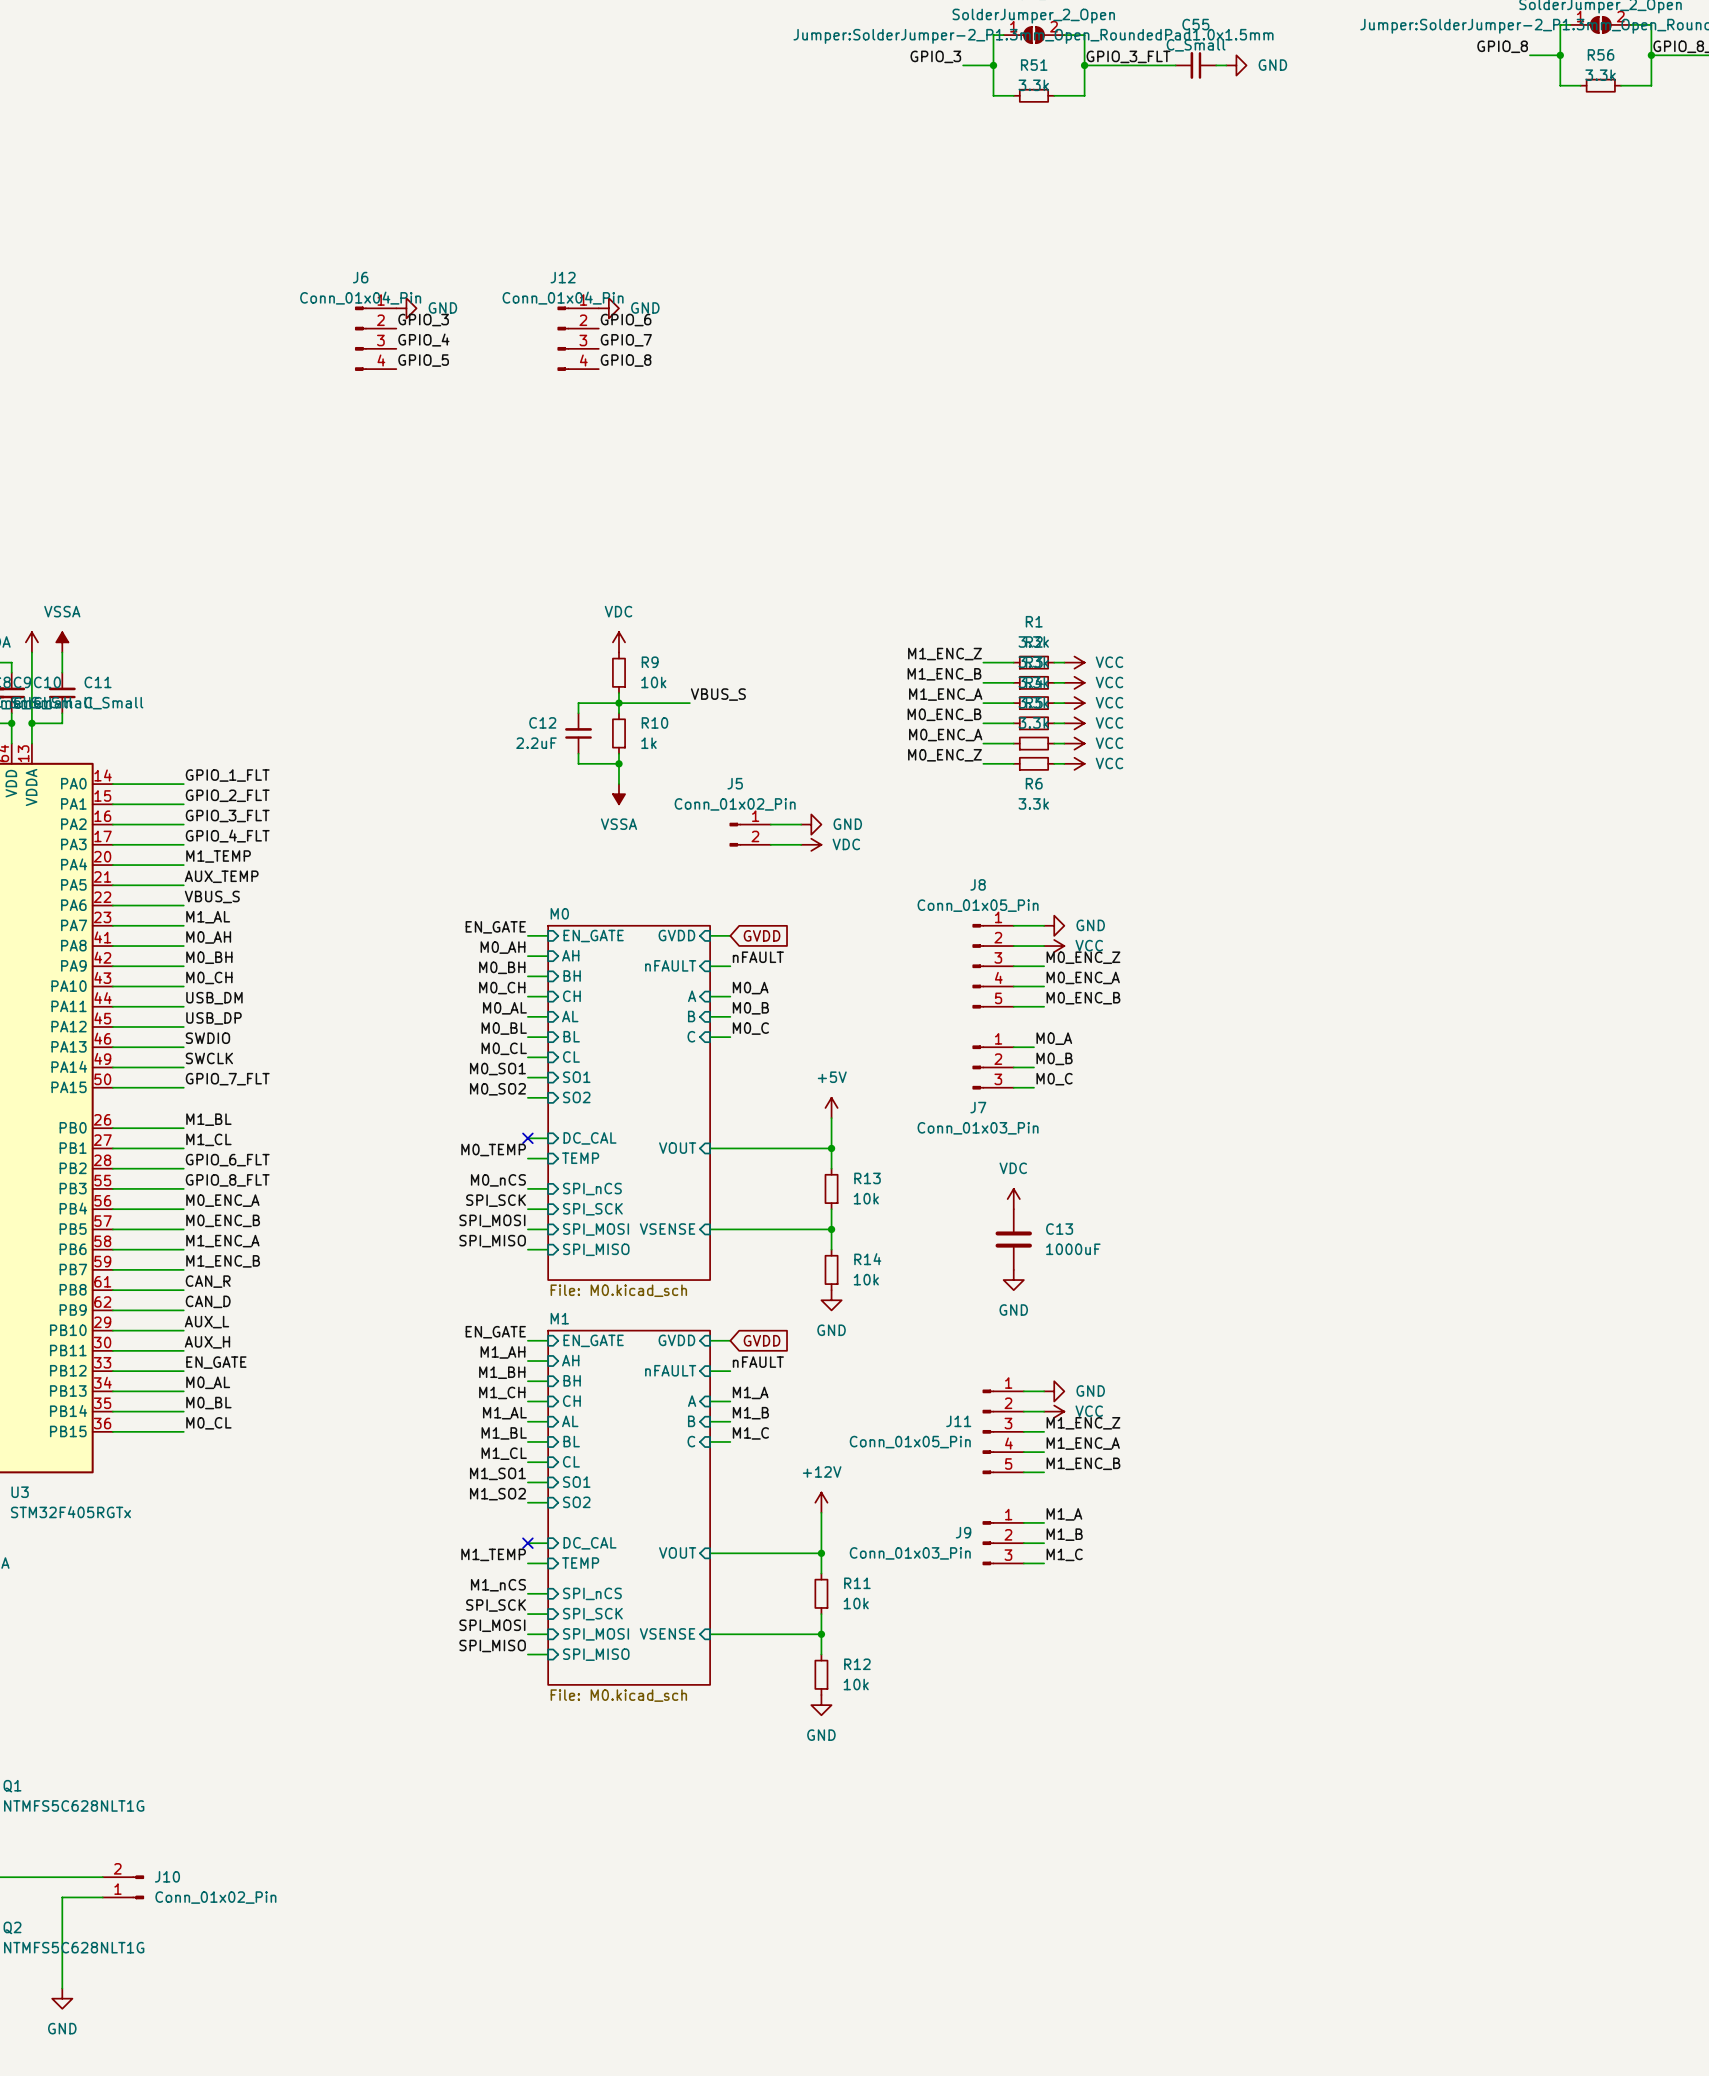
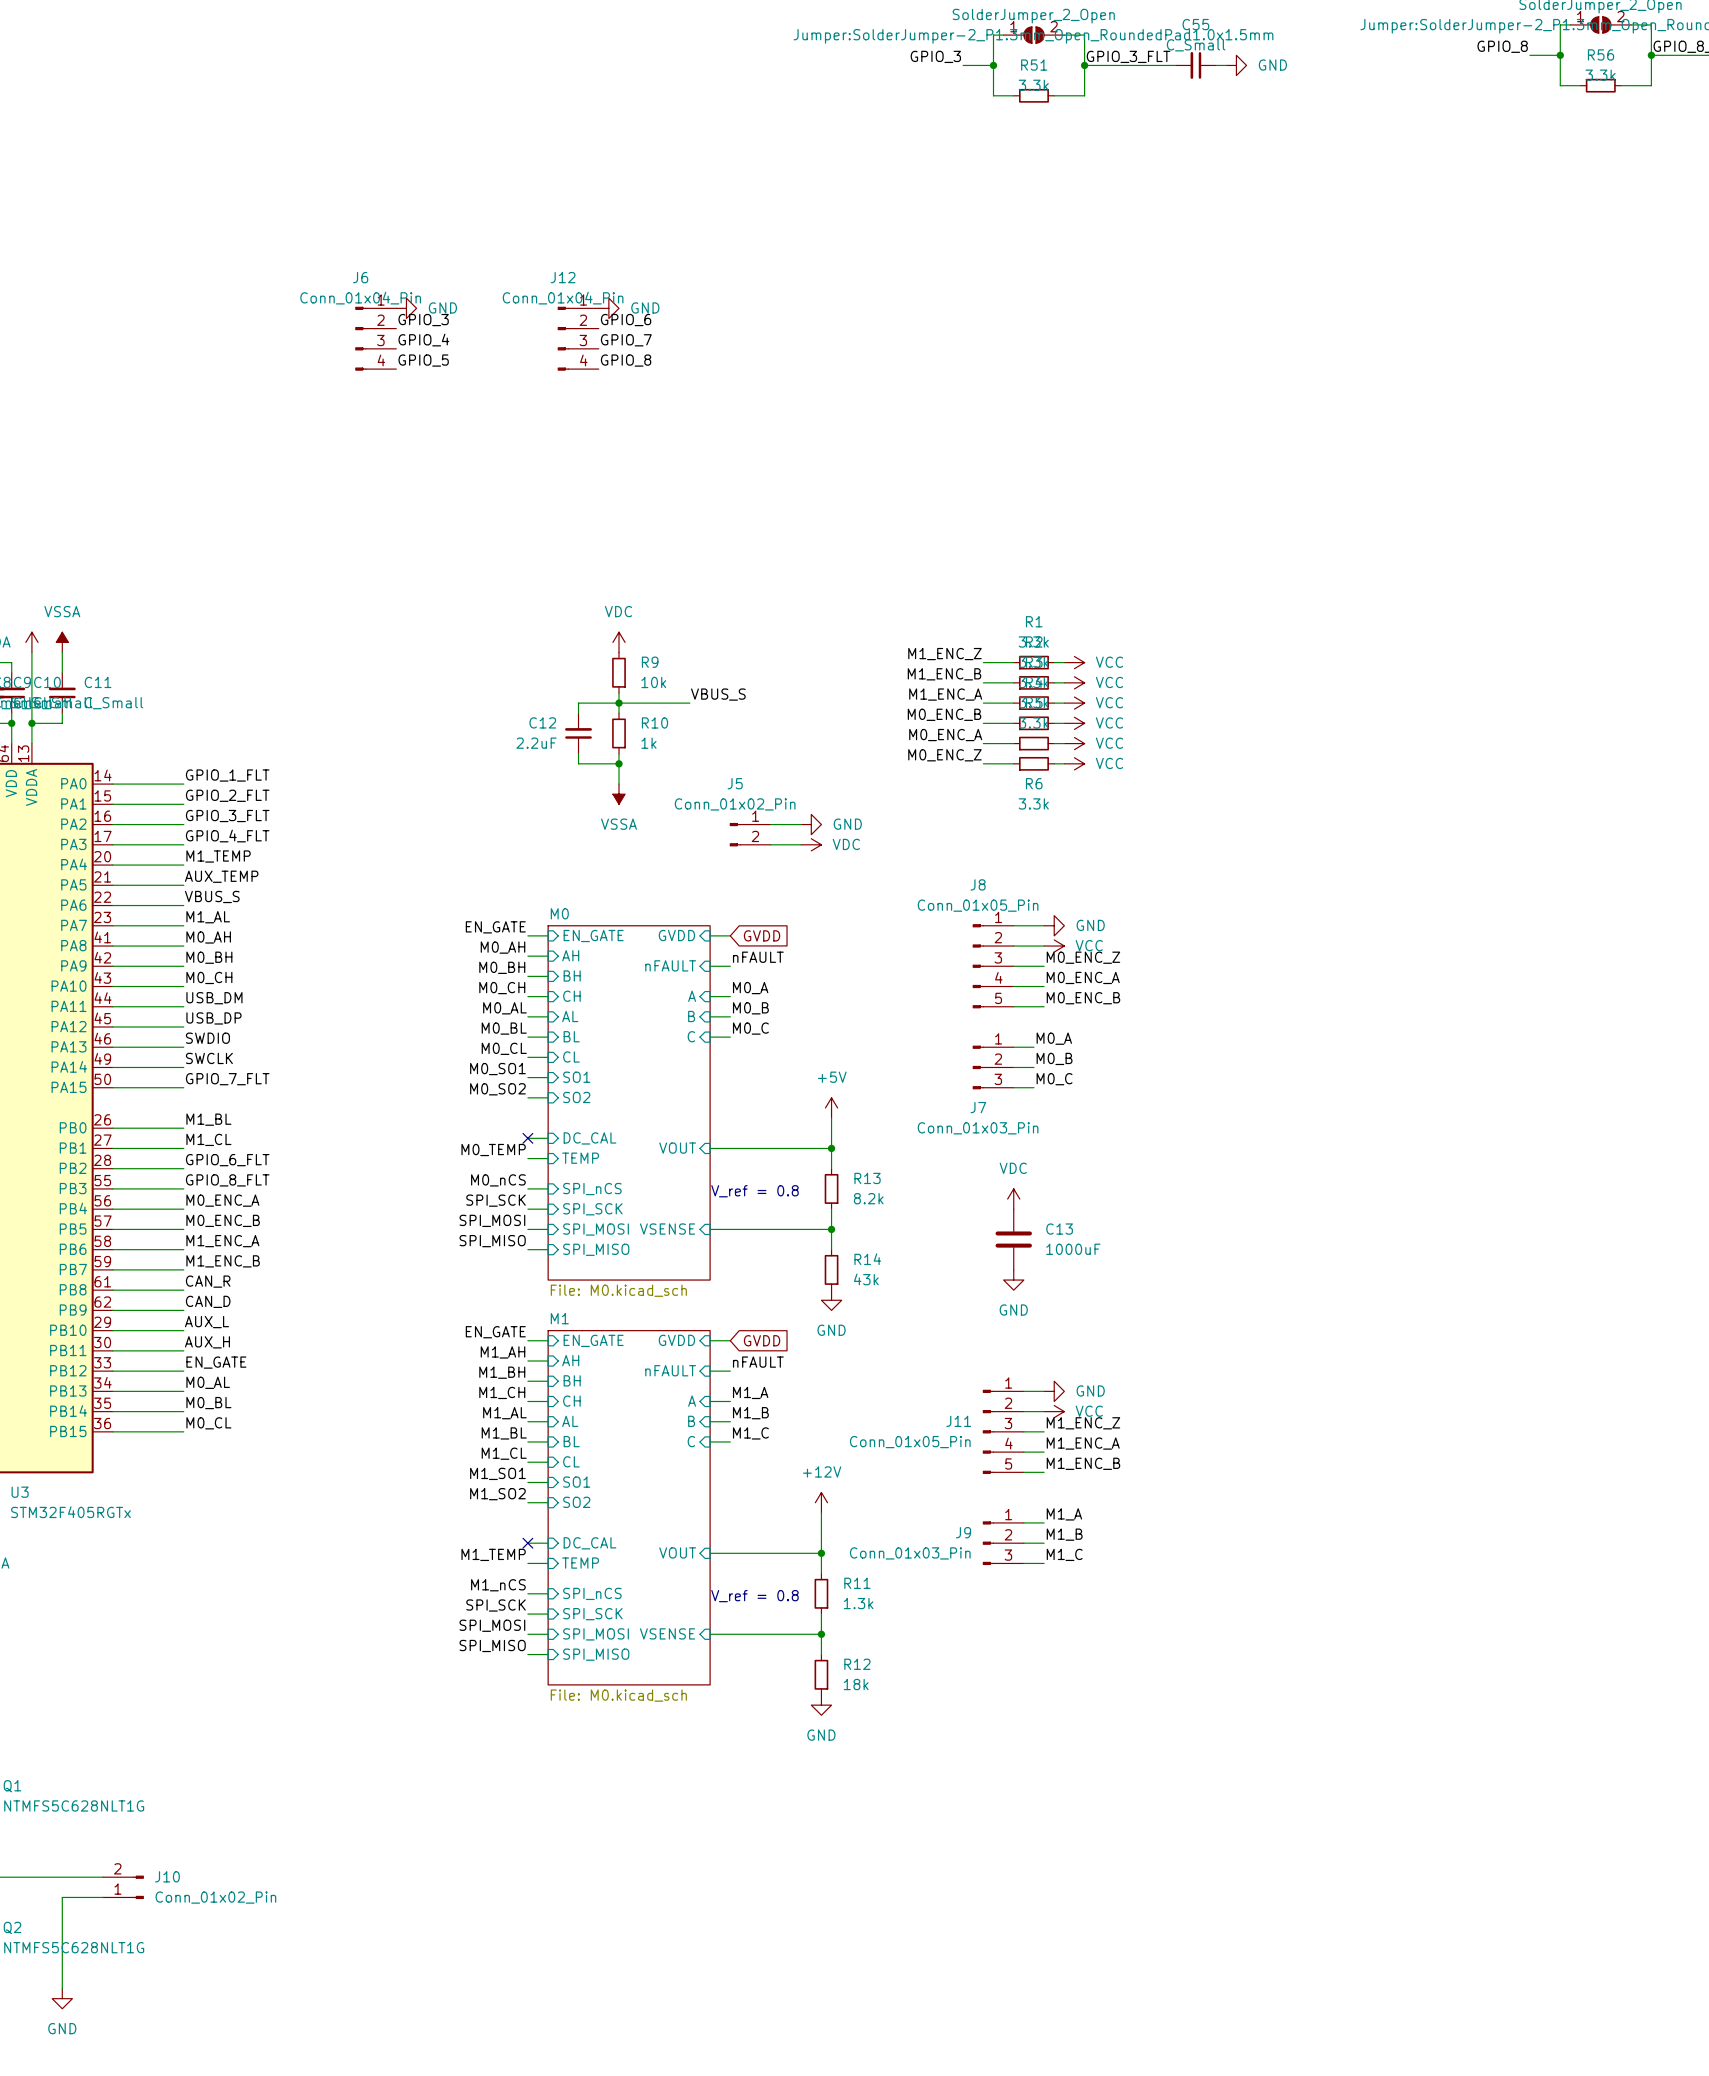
text: none -> V_ref = 0.8 (754, 1191)
R13 value: 10k (866, 1198) -> 8.2k (868, 1198)
R14 value: 10k (866, 1279) -> 43k (866, 1279)
text: none -> V_ref = 0.8 (754, 1596)
R11 value: 10k (856, 1603) -> 1.3k (858, 1603)
R12 value: 10k (856, 1684) -> 18k (856, 1684)

